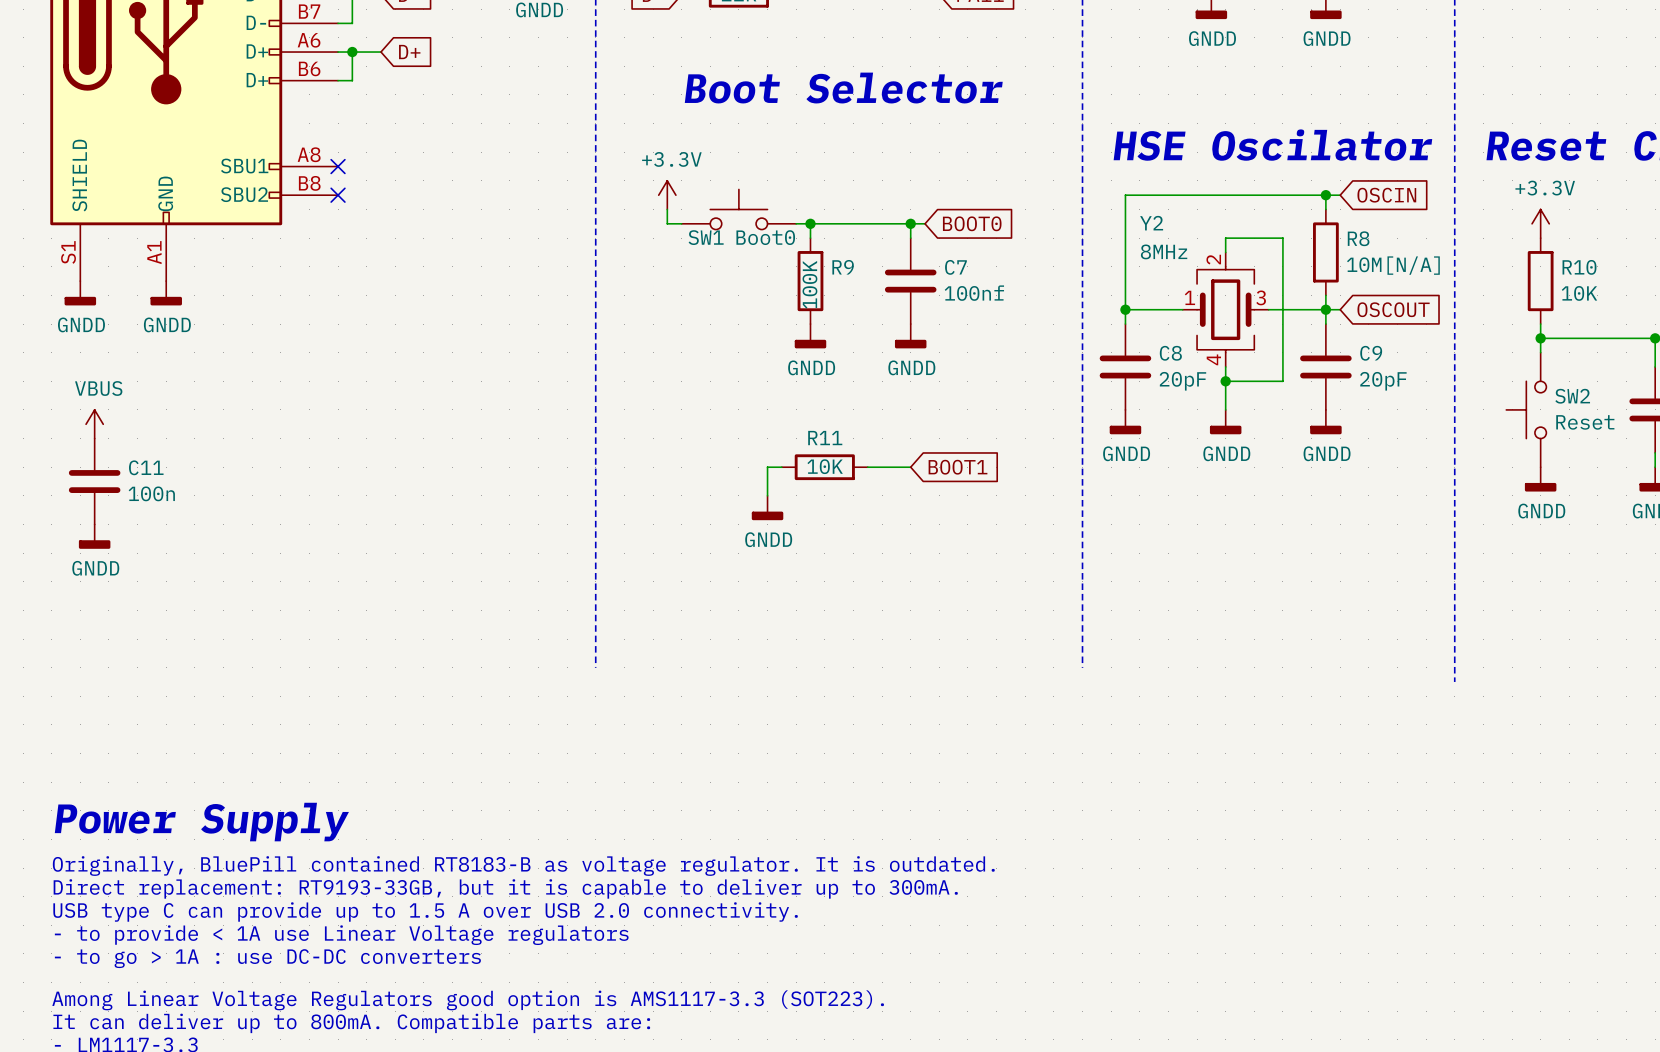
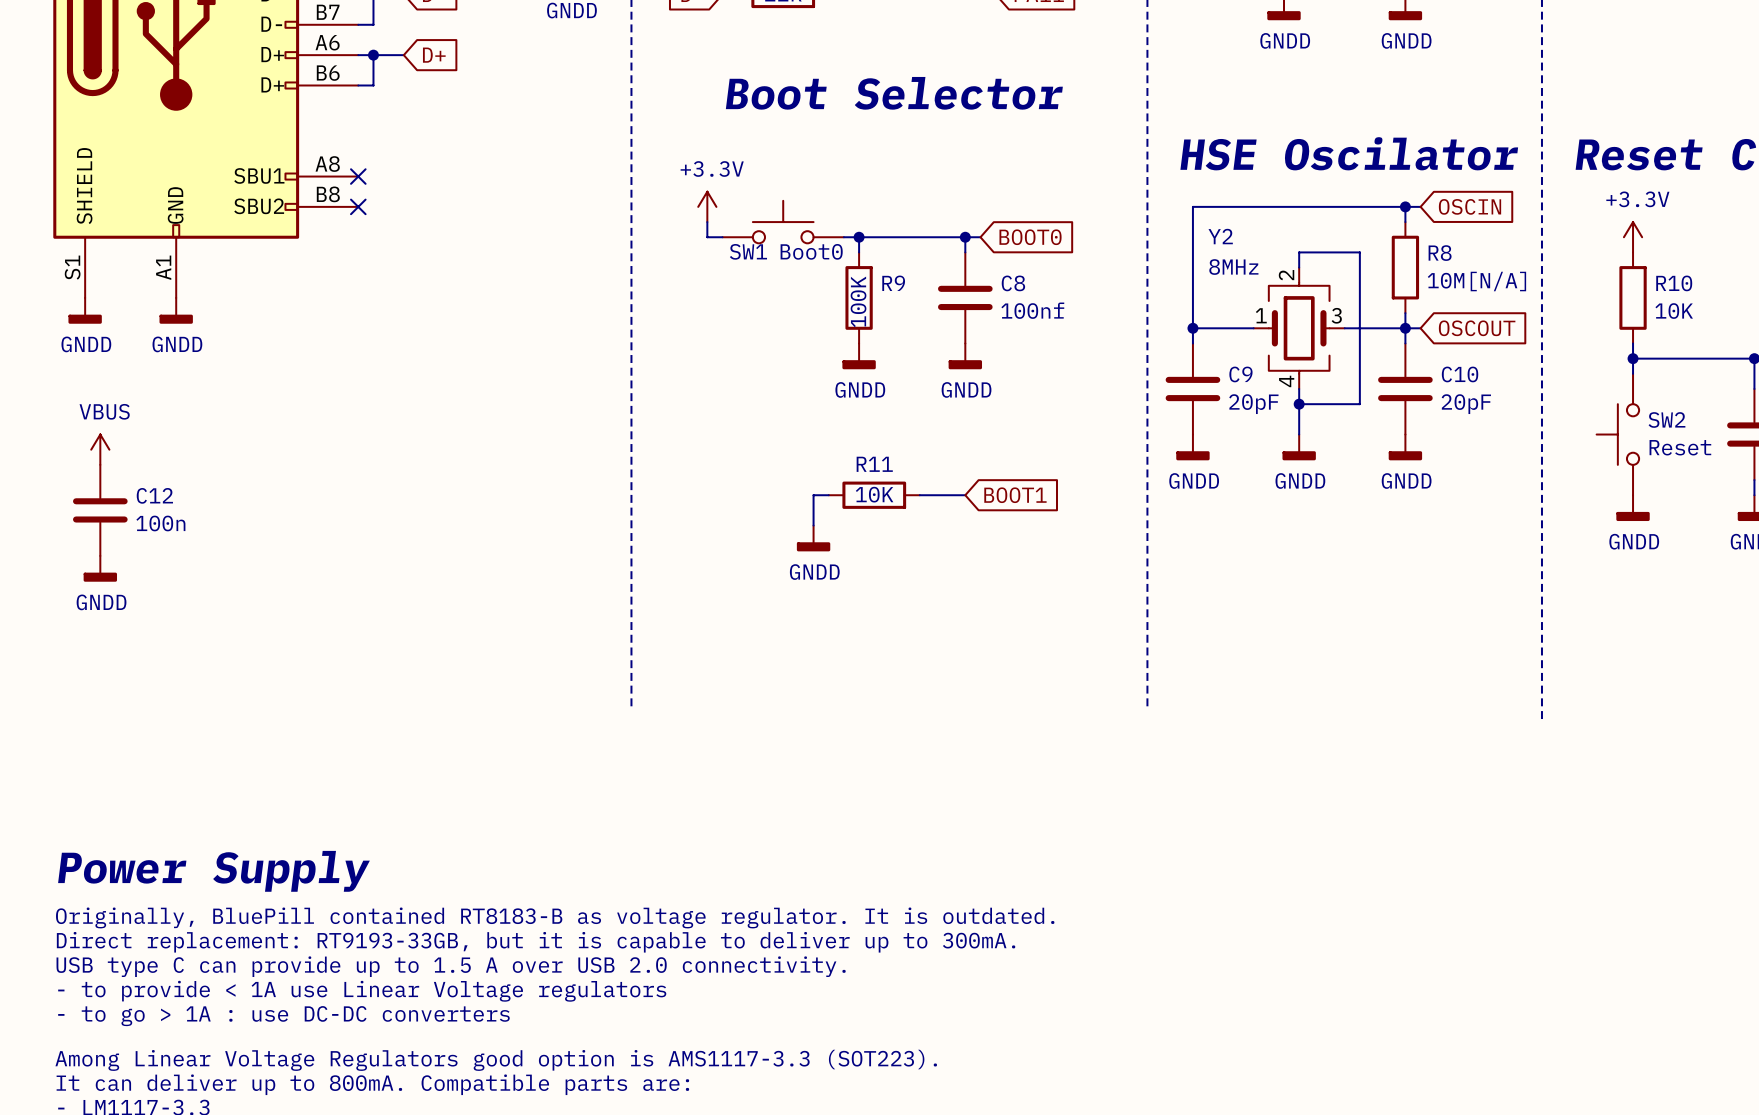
C7 name: C7 (955, 267) -> C8 (1013, 283)
C8 name: C8 (1170, 353) -> C9 (1240, 374)
C9 name: C9 (1371, 353) -> C10 (1460, 374)
C11 name: C11 (146, 467) -> C12 (154, 495)

